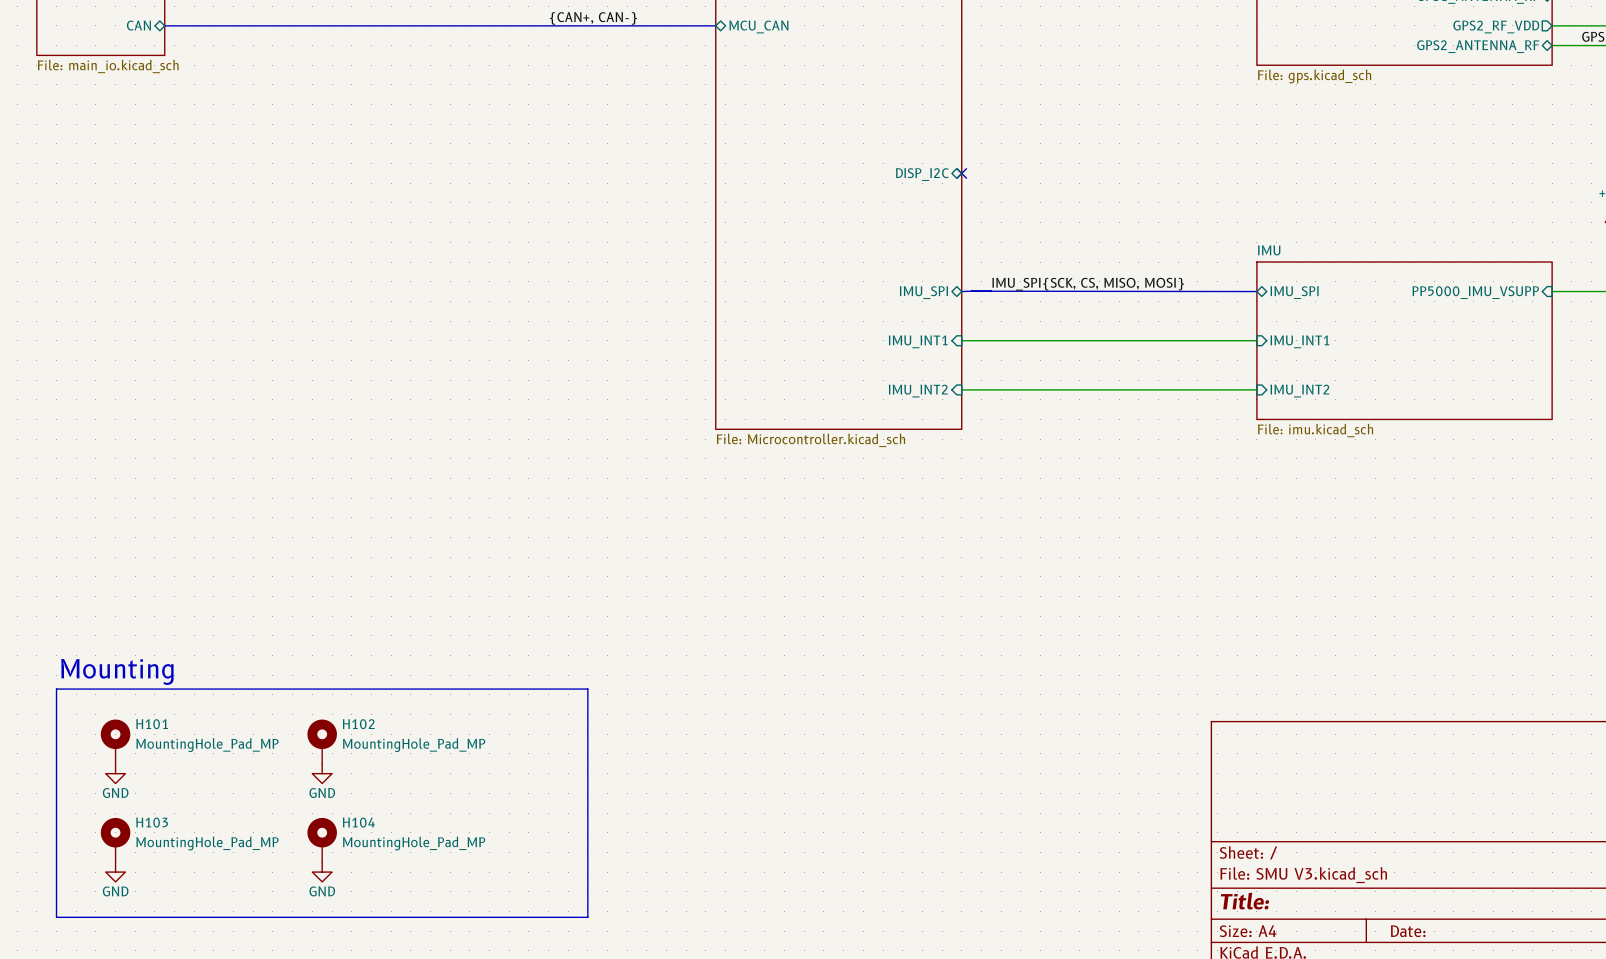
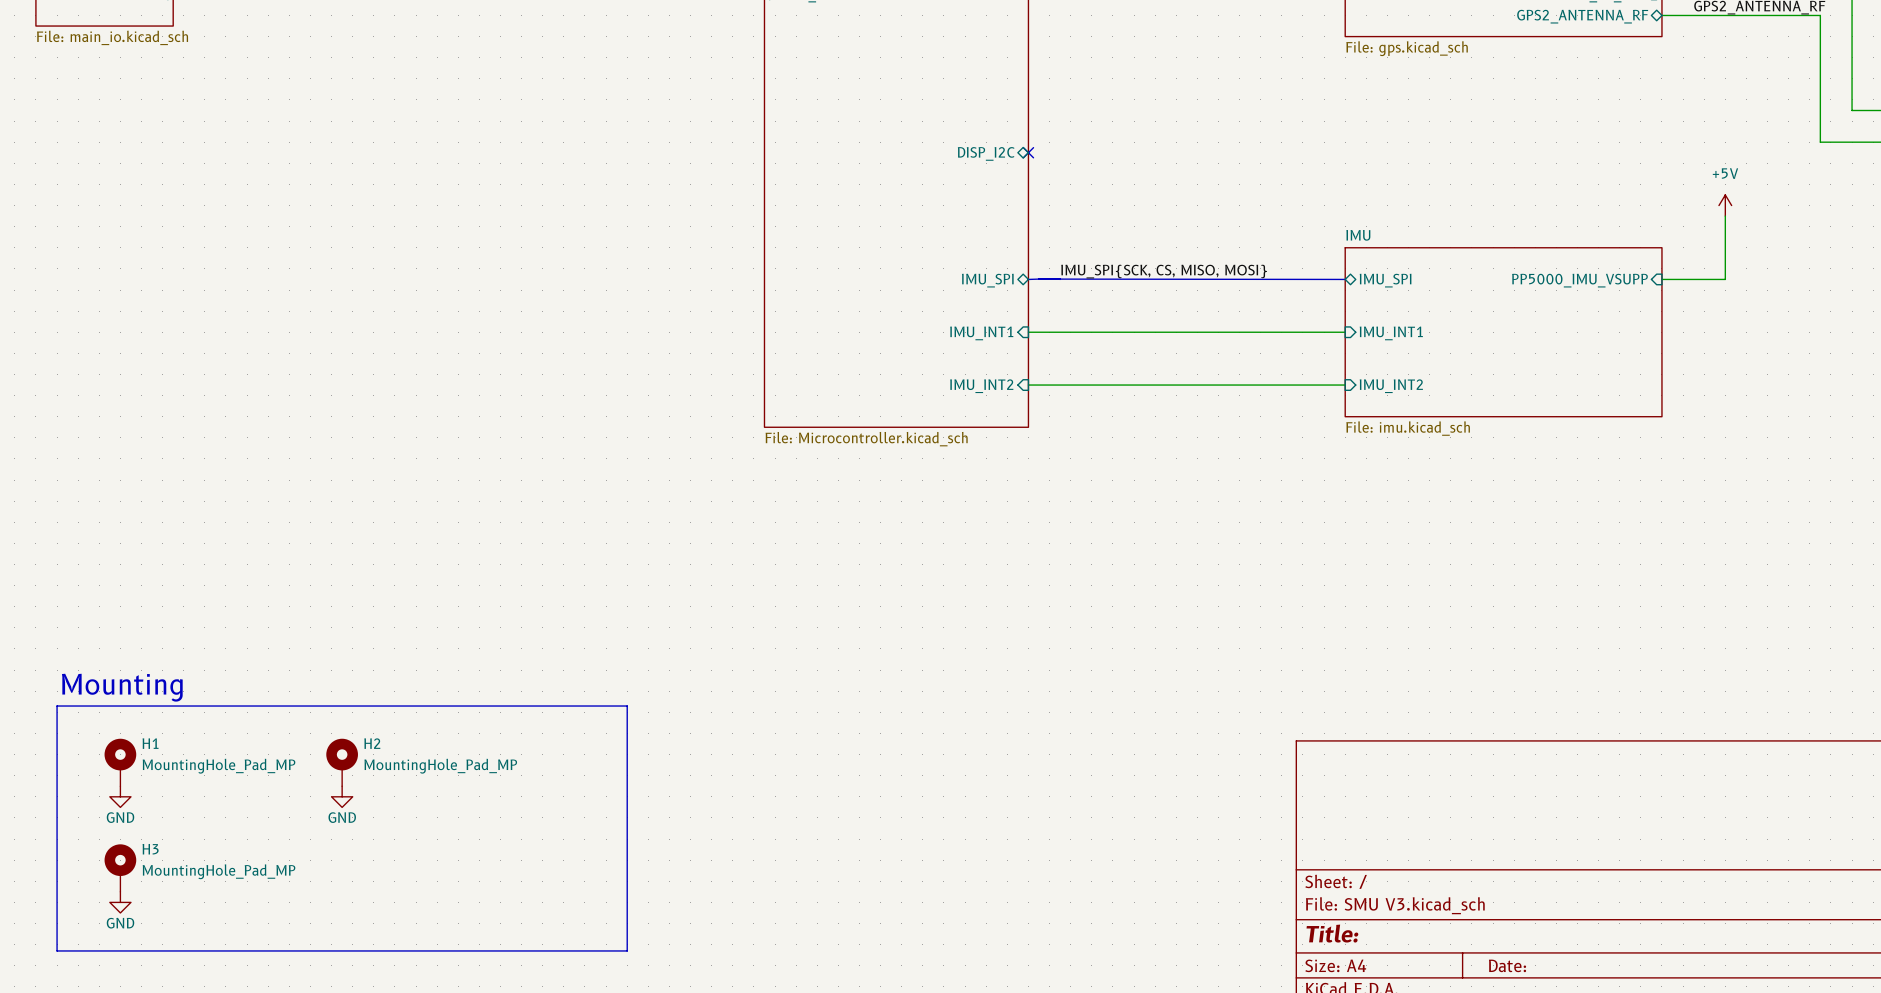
H101 name: H101 (152, 724) -> H1 (150, 743)
H102 name: H102 (358, 724) -> H2 (372, 743)
H103 name: H103 (152, 822) -> H3 (150, 849)
H104: MountingHole_Pad_MP (322, 840) -> none
power symbol: GND (322, 872) -> none

